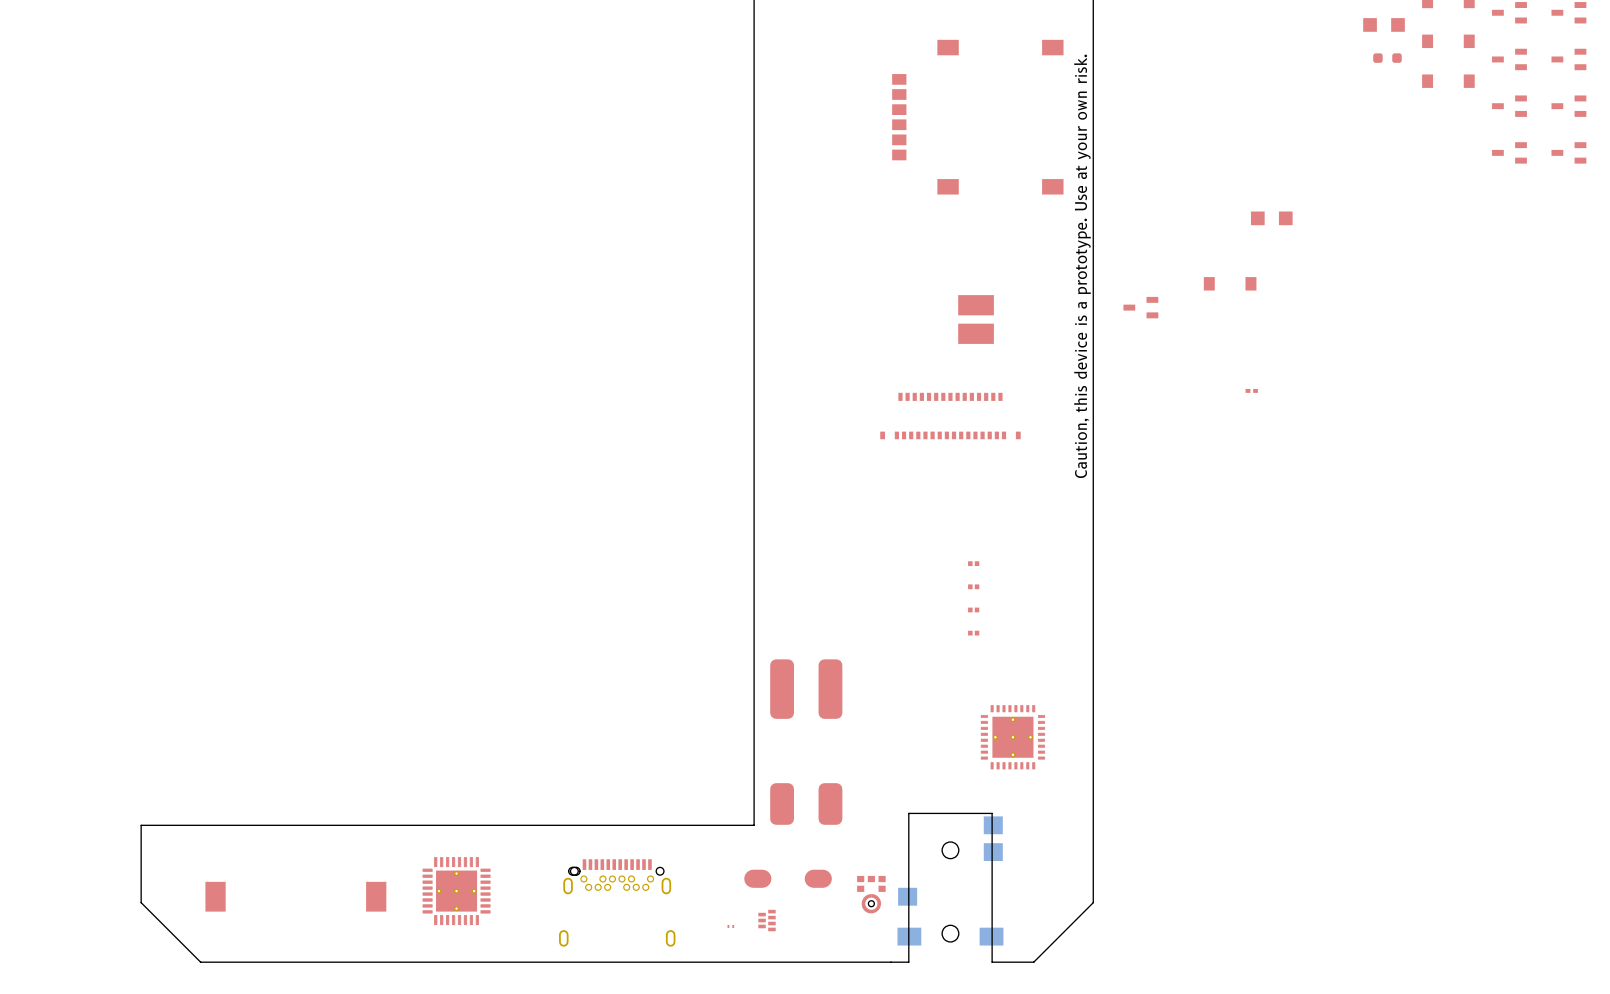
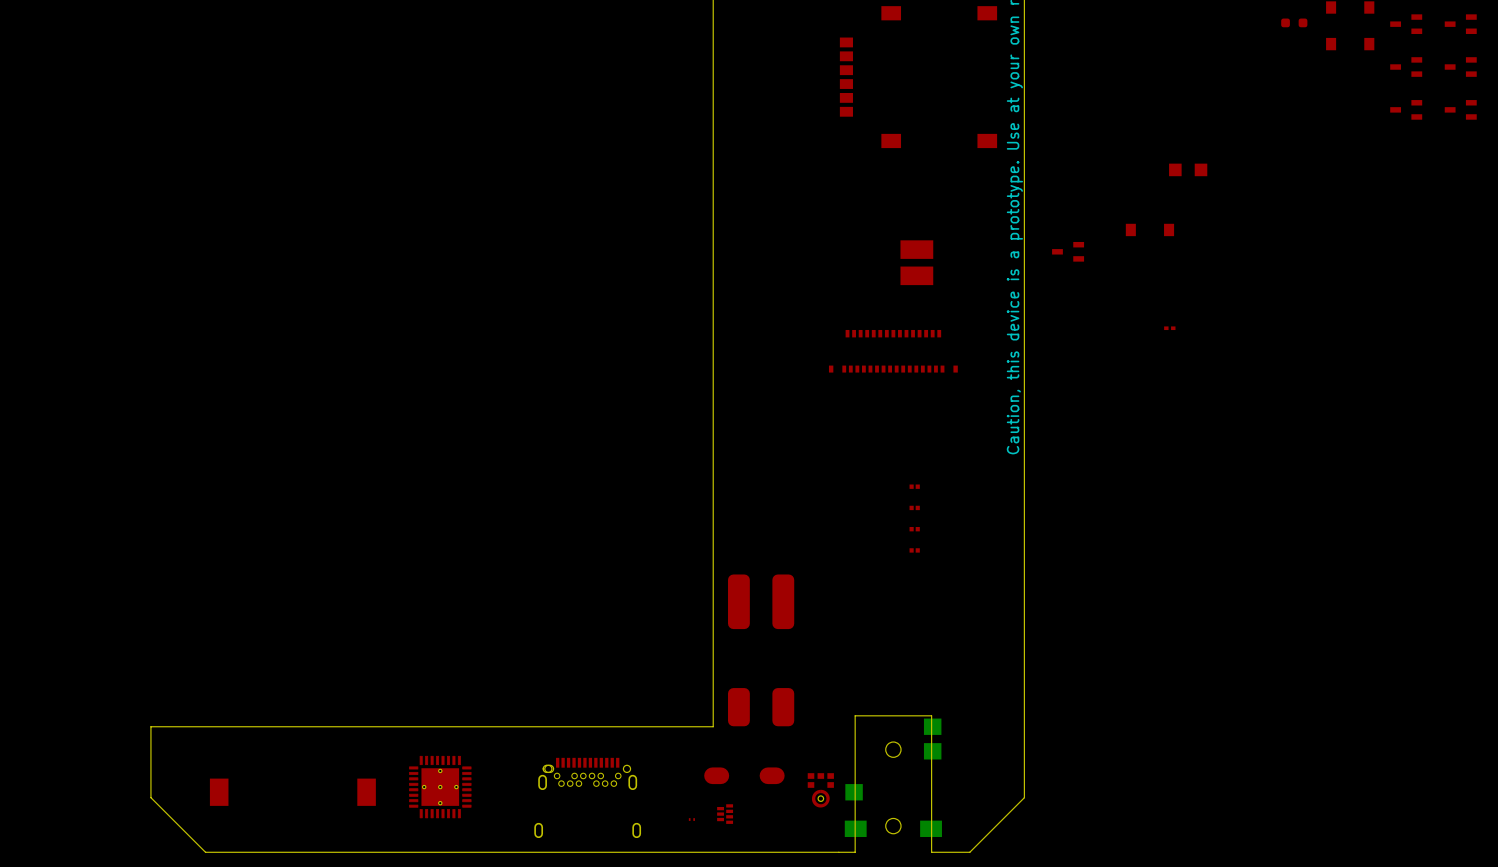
part: (1012, 737) -> none

